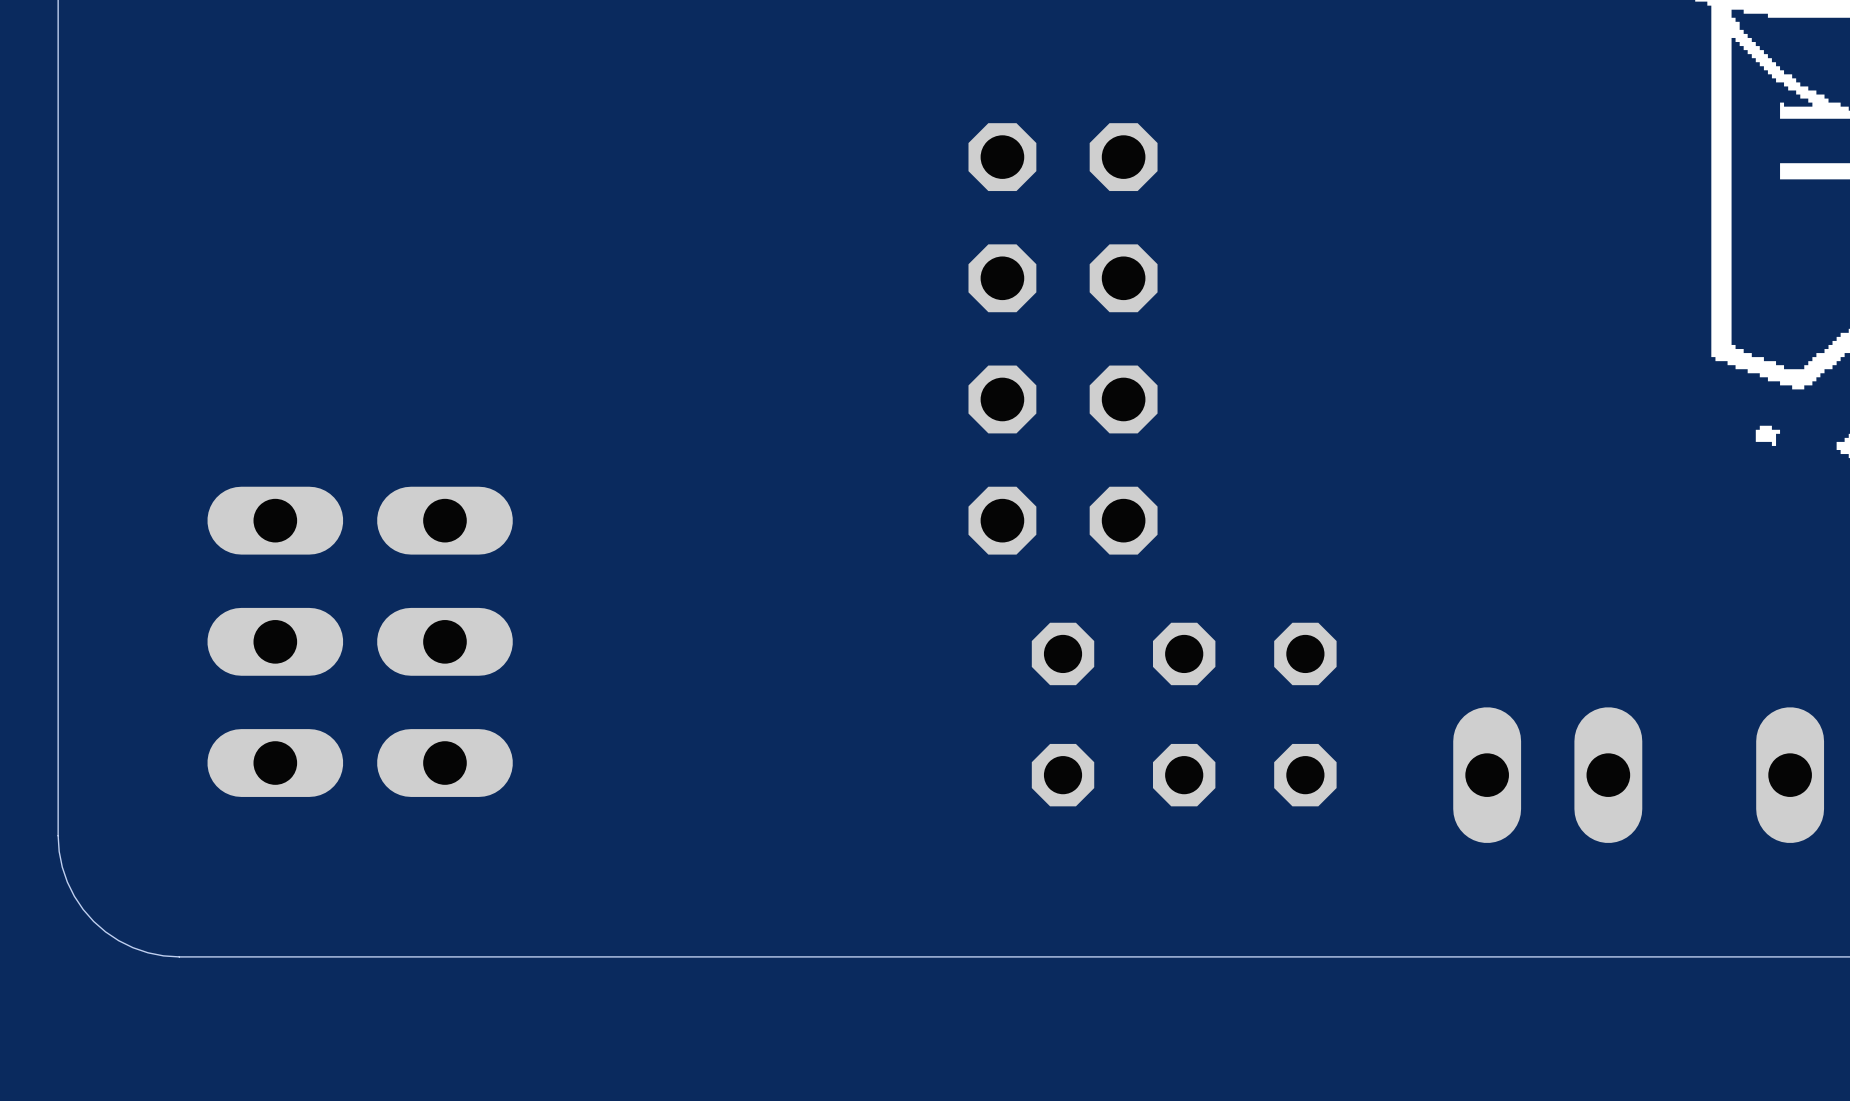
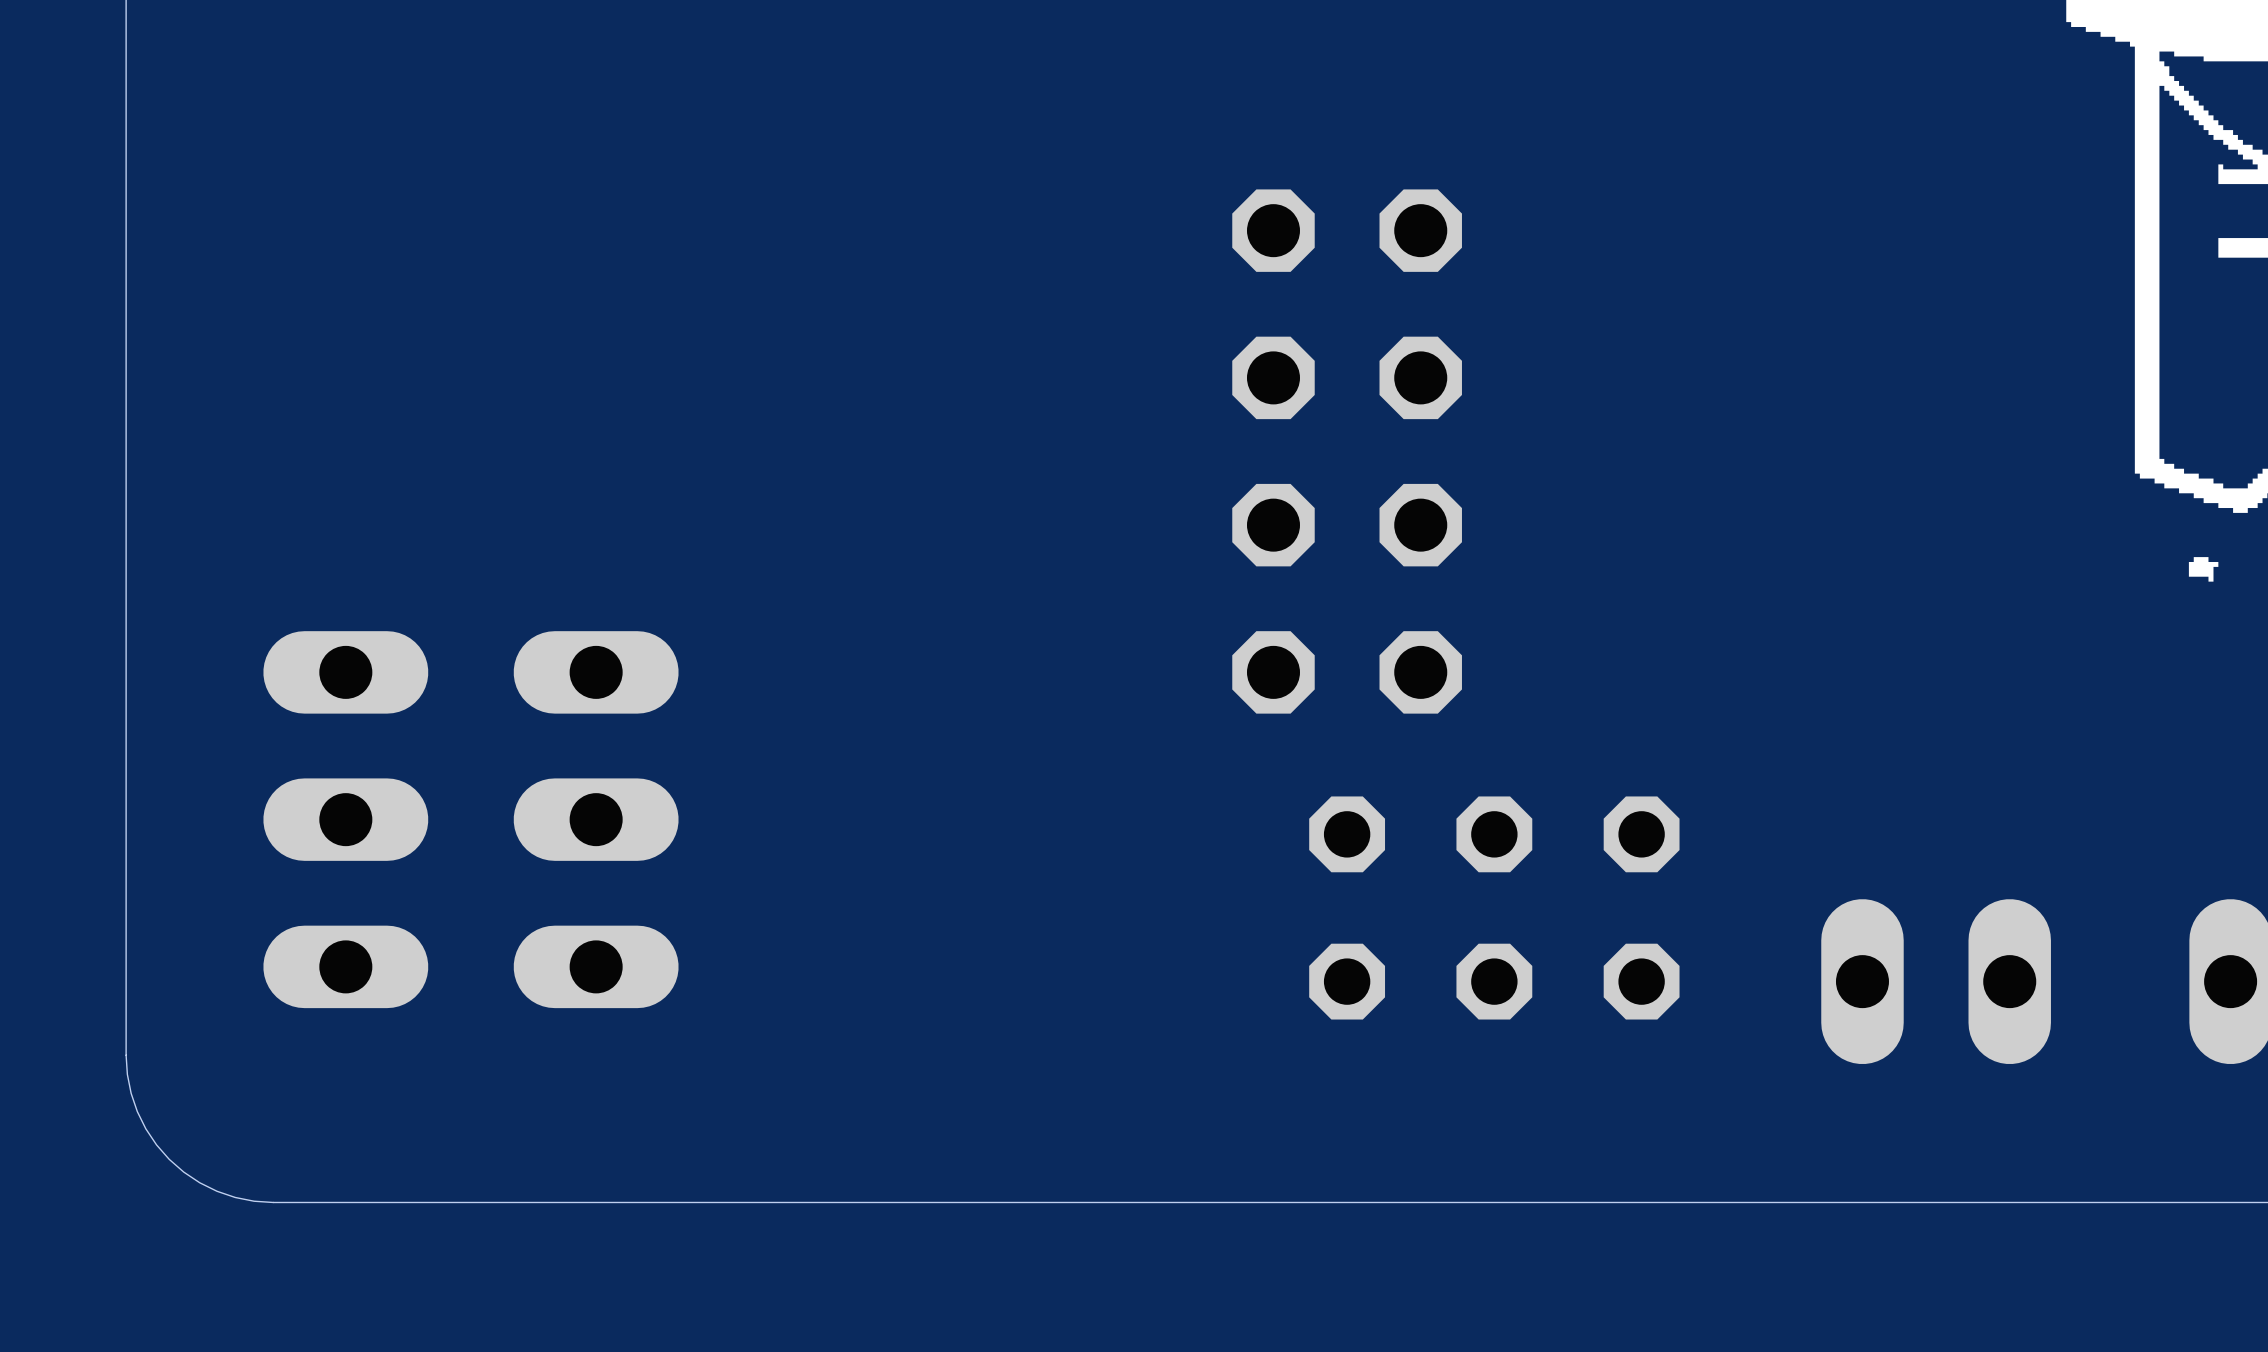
part position: (275, 641) -> (345, 819)

